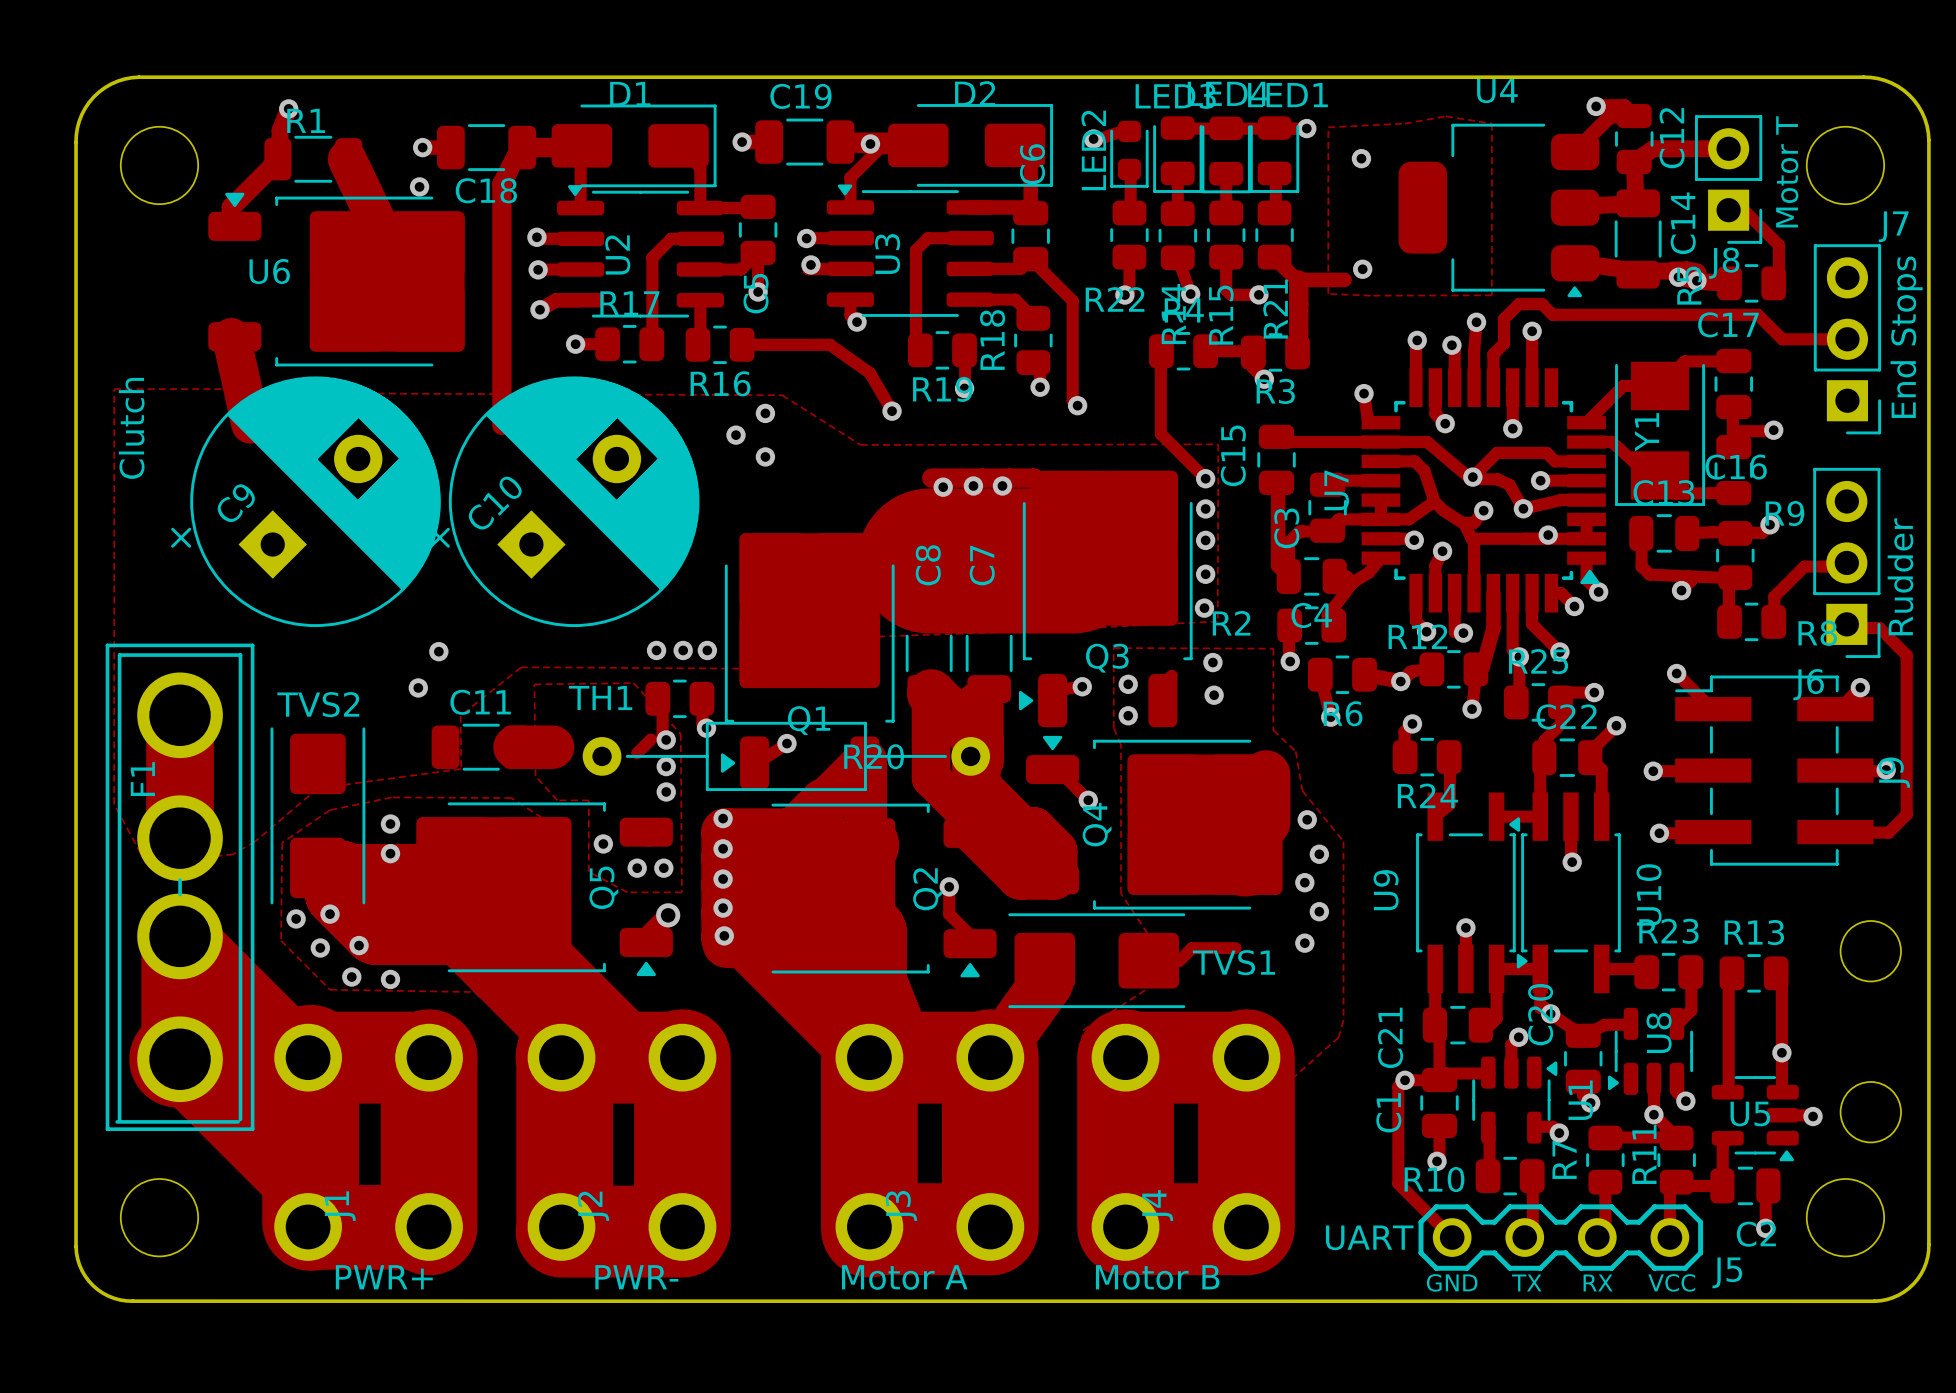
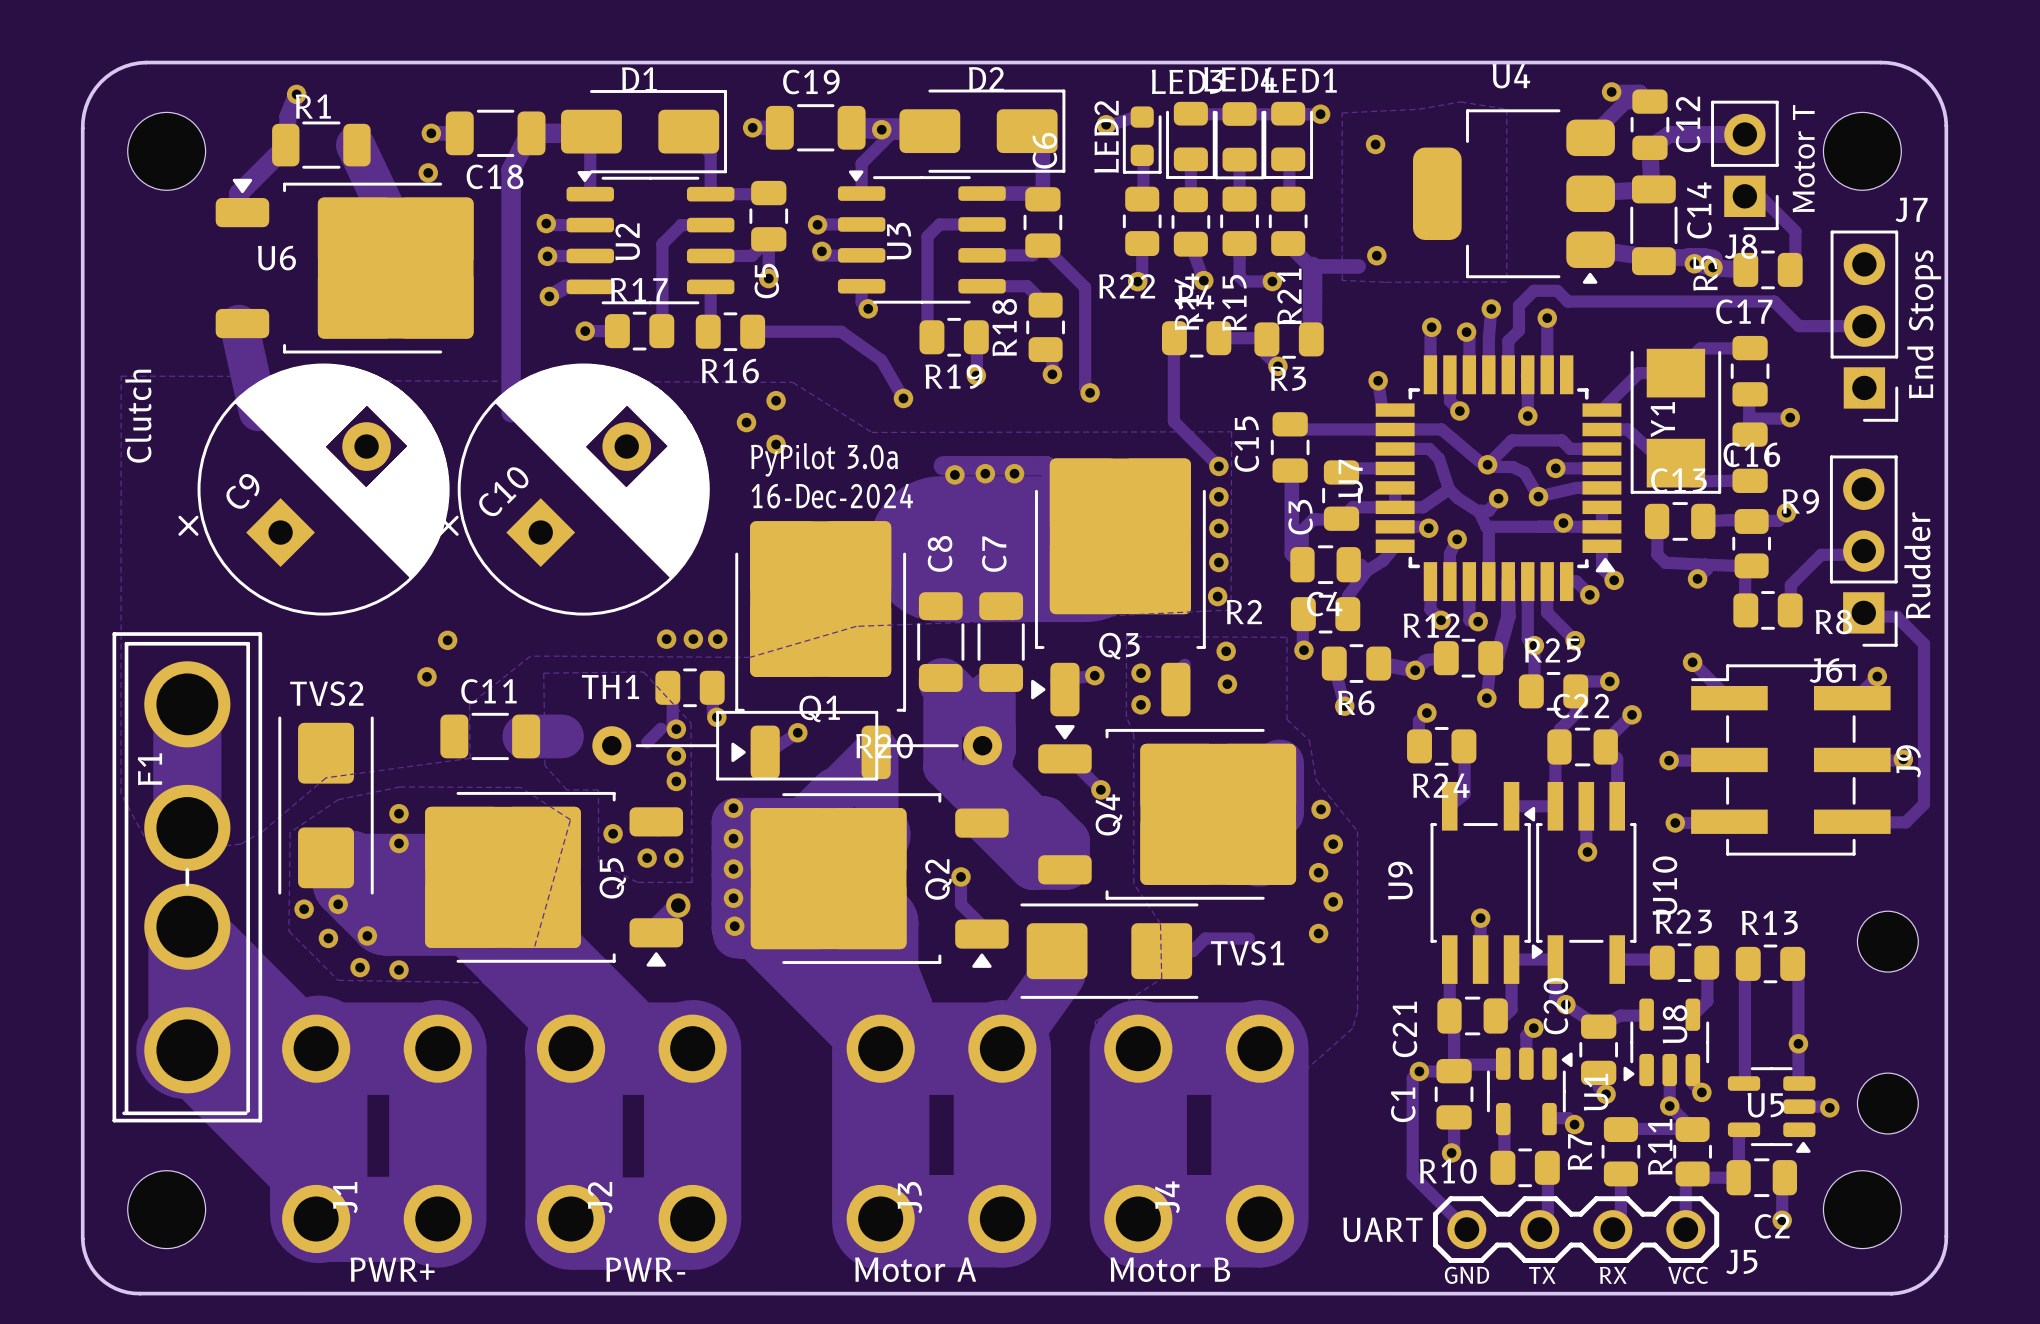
text: none -> PyPilot 3.0a (824, 459)
text: none -> 16-Dec-2024 (832, 496)

